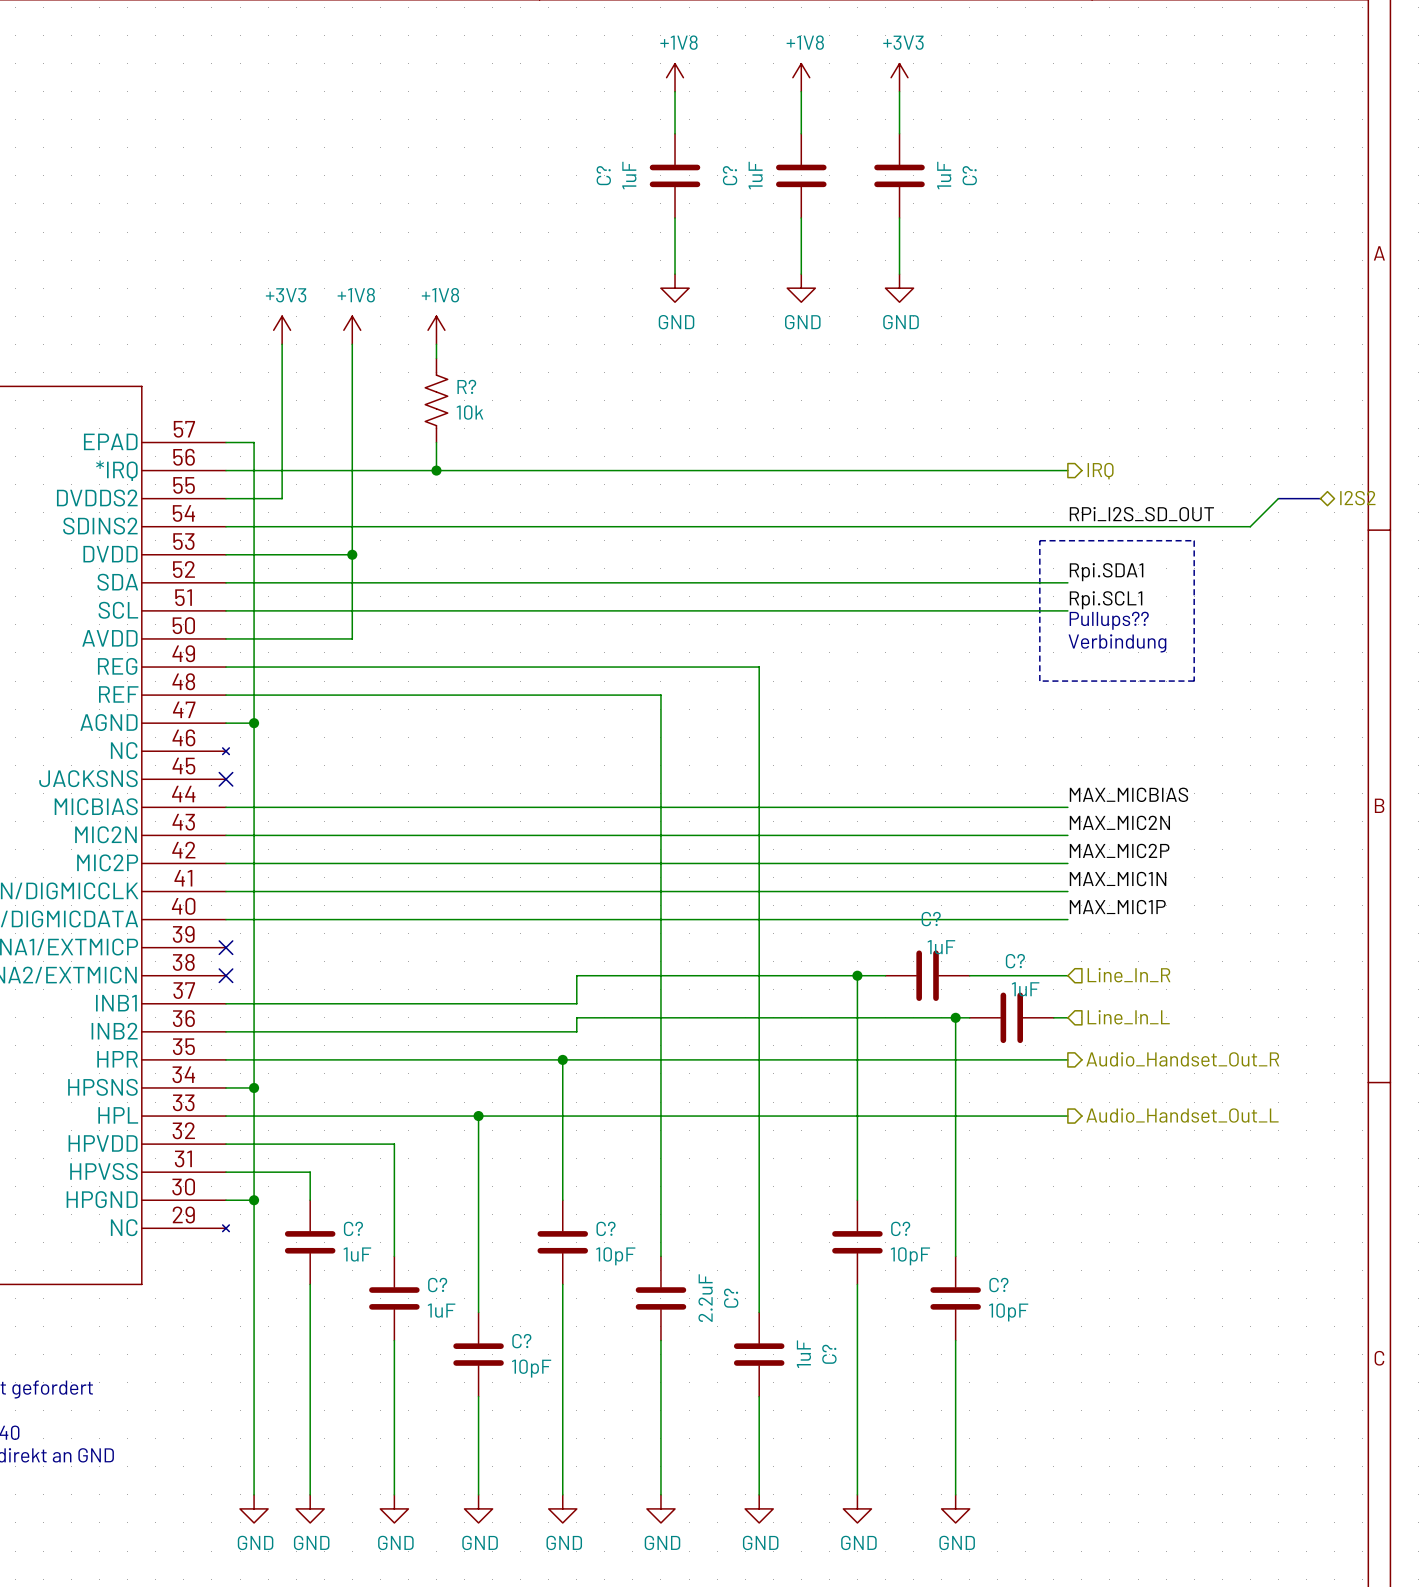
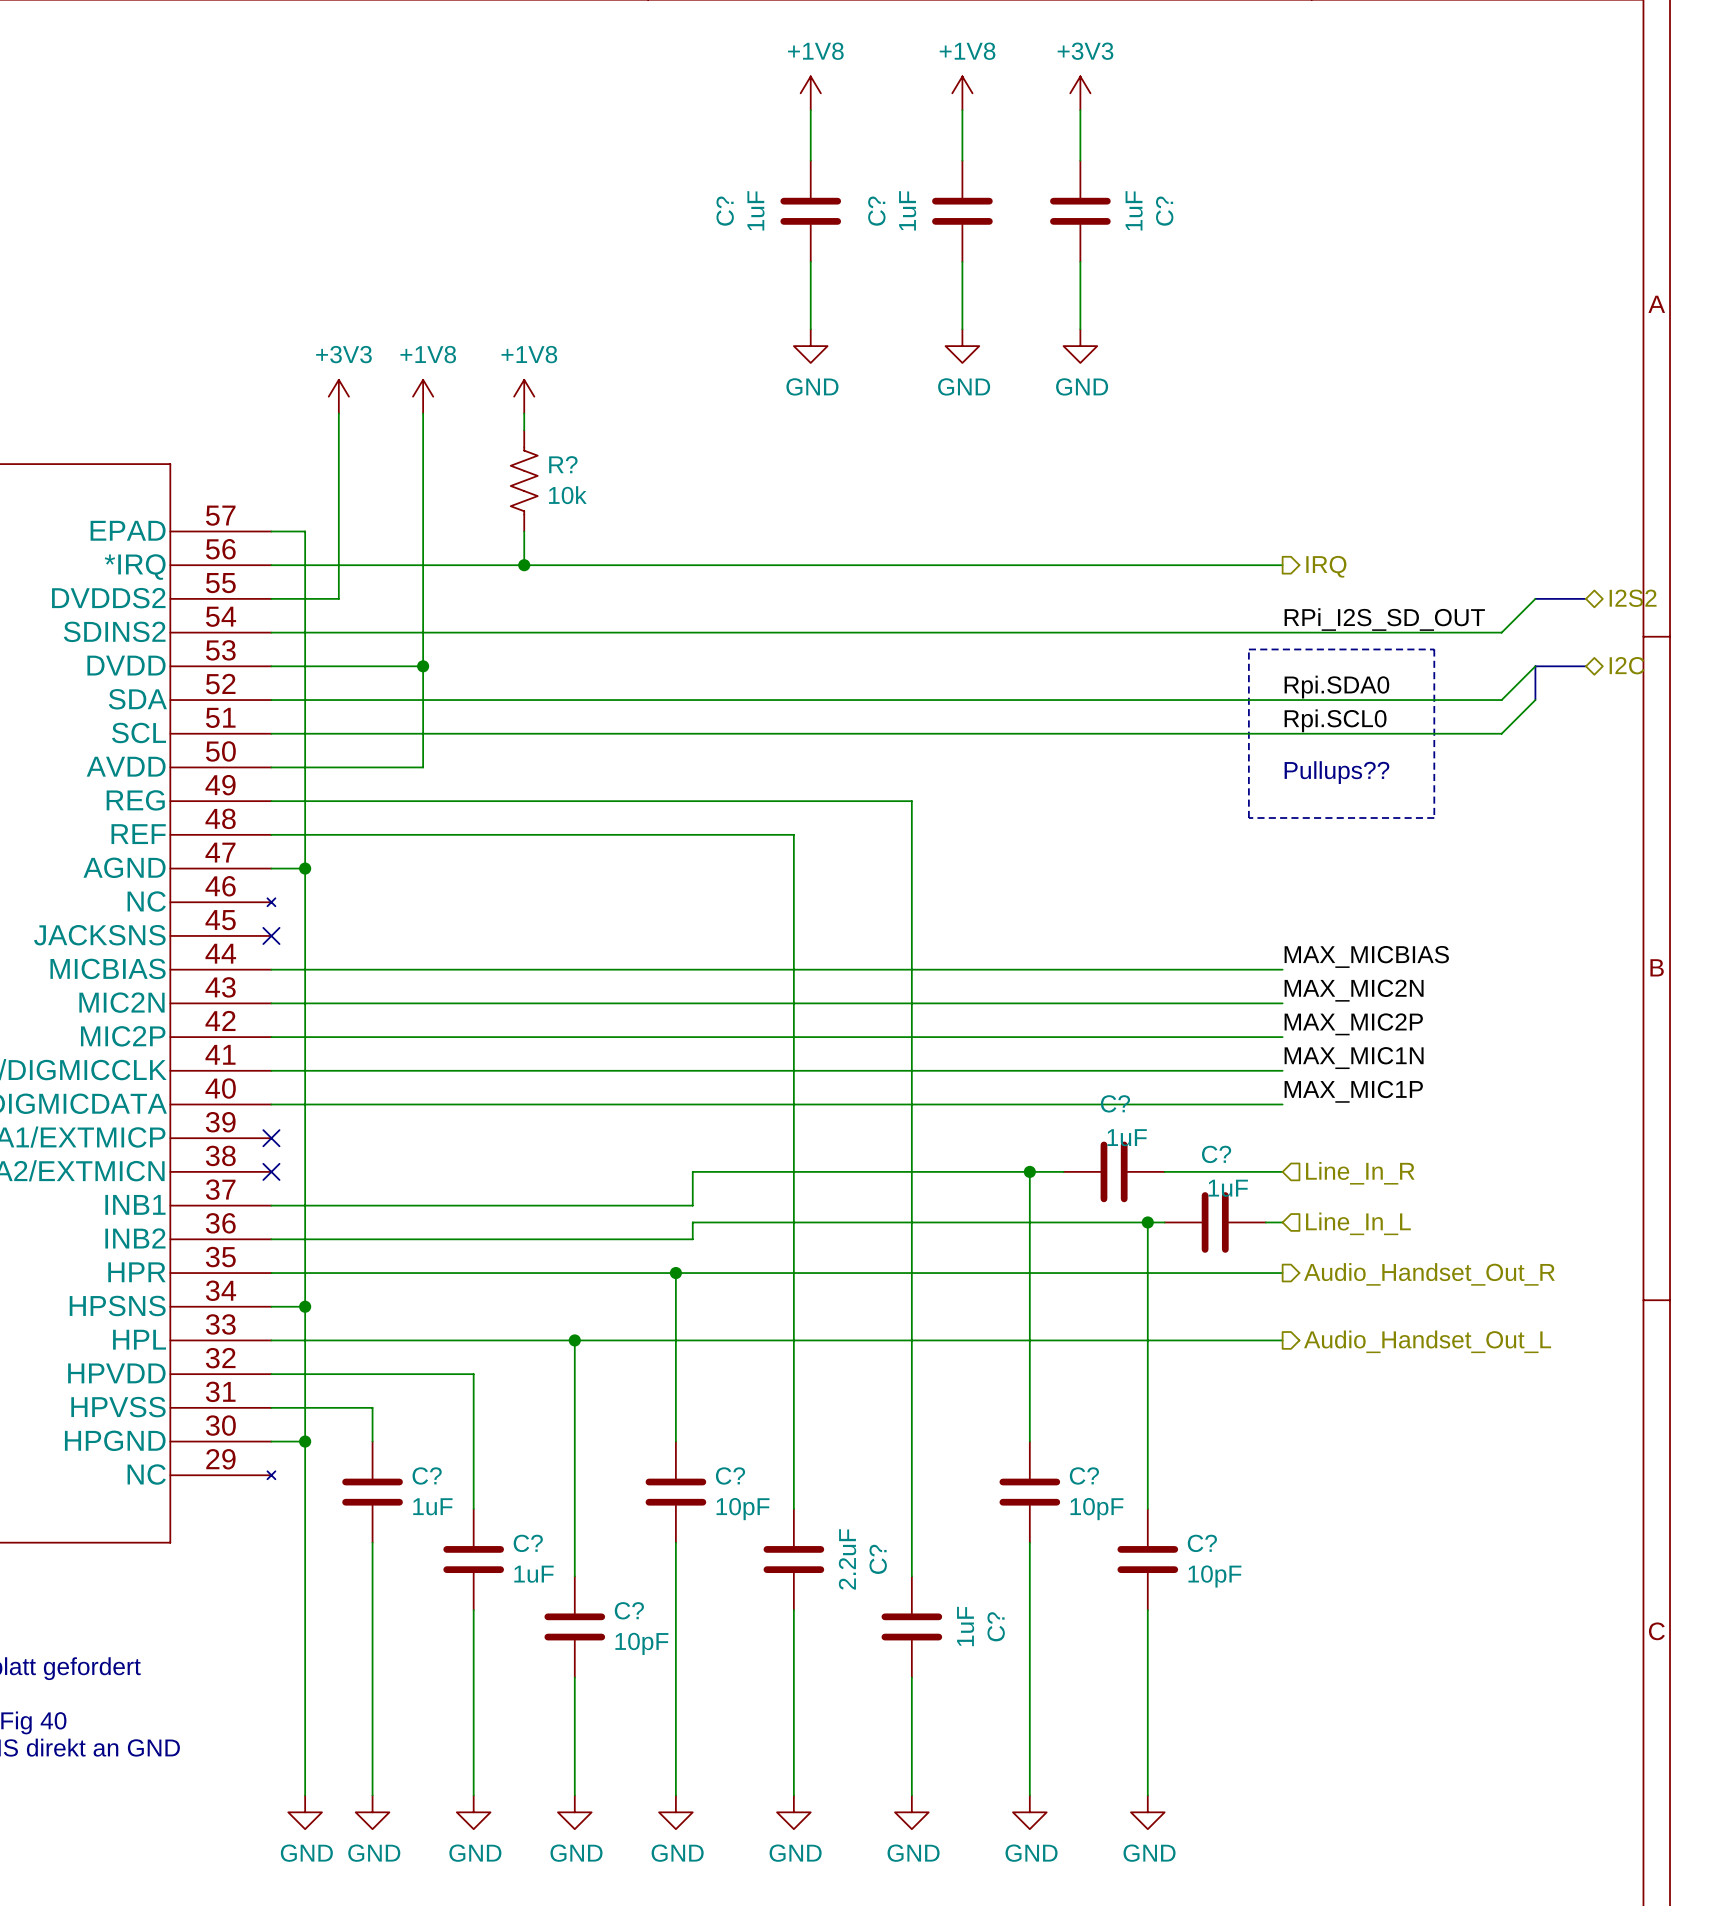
wire: none -> (1535, 666) (1501, 700) (1282, 700)
bus: none -> (1585, 666) (1535, 666) (1535, 700)
hierarchical label: none -> I2C (1627, 665)
label: Rpi.SDA1 (1106, 572) -> Rpi.SDA0 (1336, 687)
wire: none -> (1535, 700) (1501, 733) (1282, 733)
label: Rpi.SCL1 (1106, 600) -> Rpi.SCL0 (1335, 720)
text: Pullups?? (1109, 620) -> none
text: Verbindung (1117, 643) -> Pullups?? (1336, 772)

